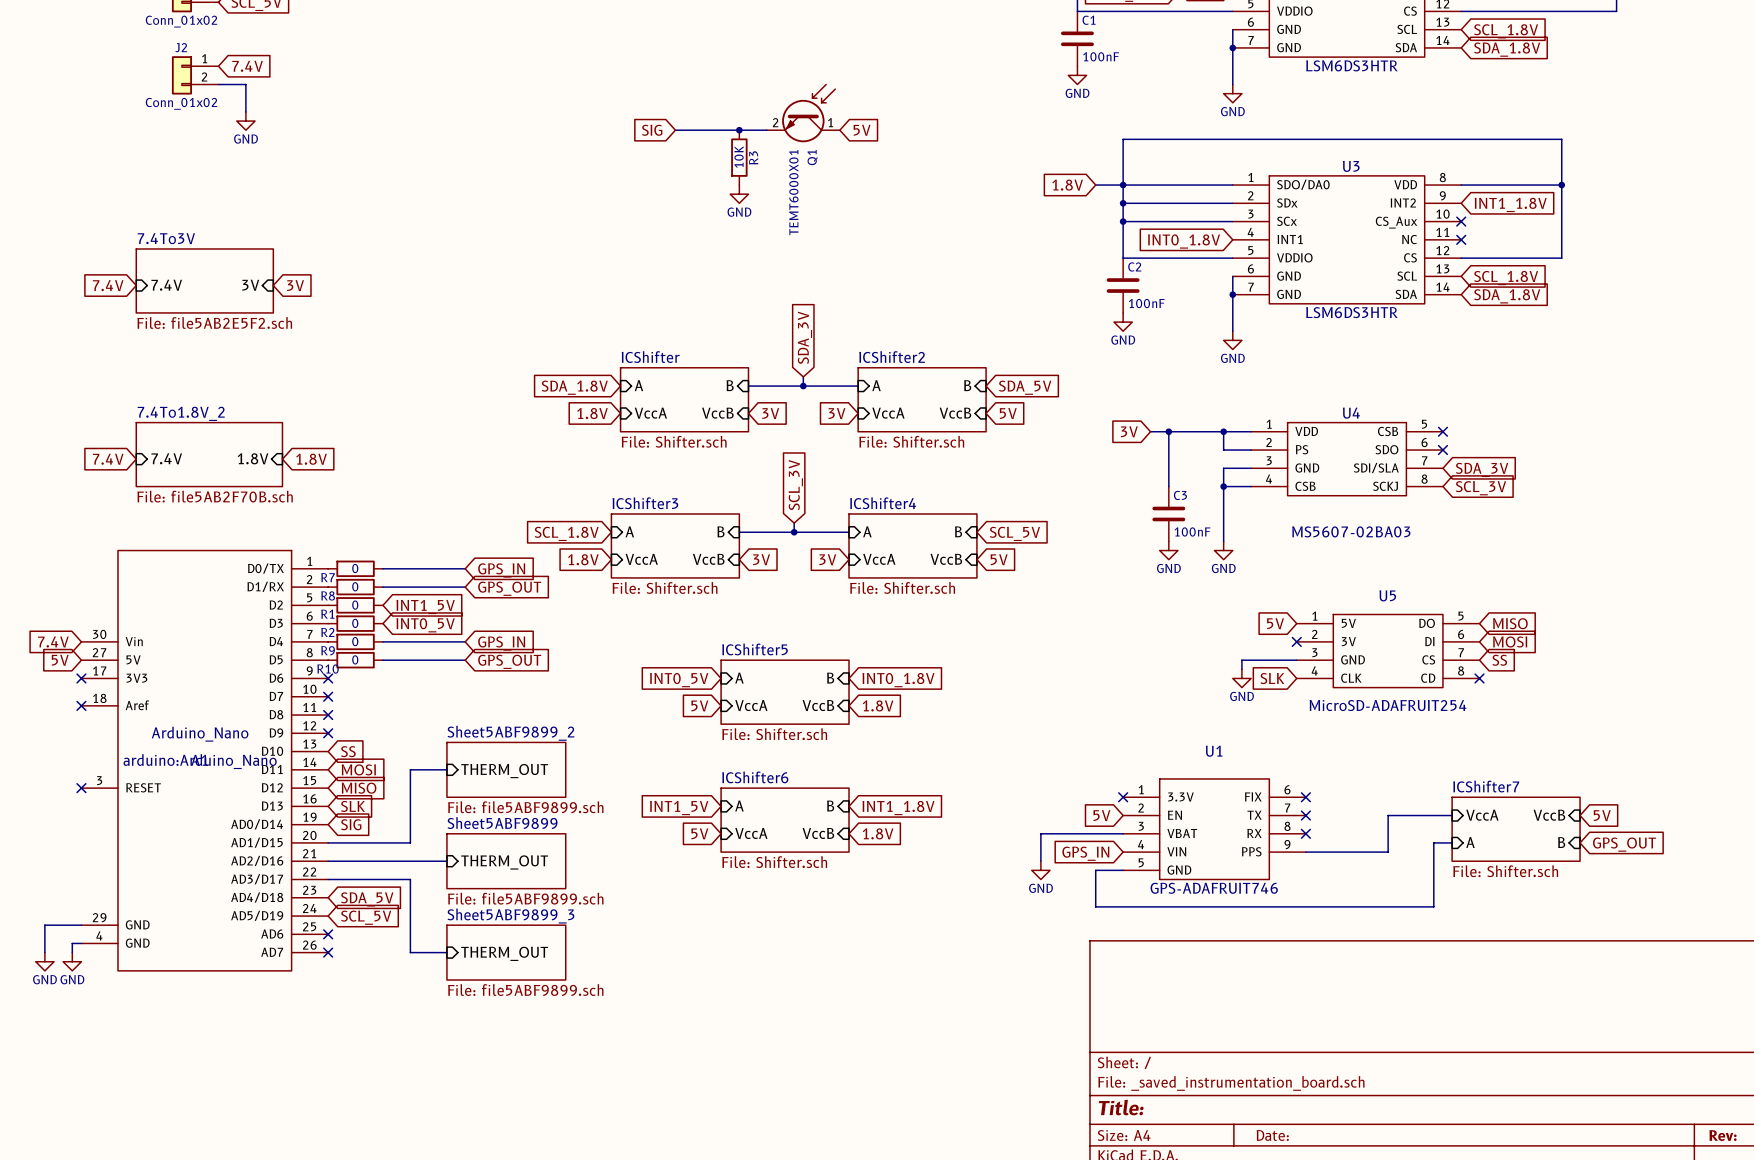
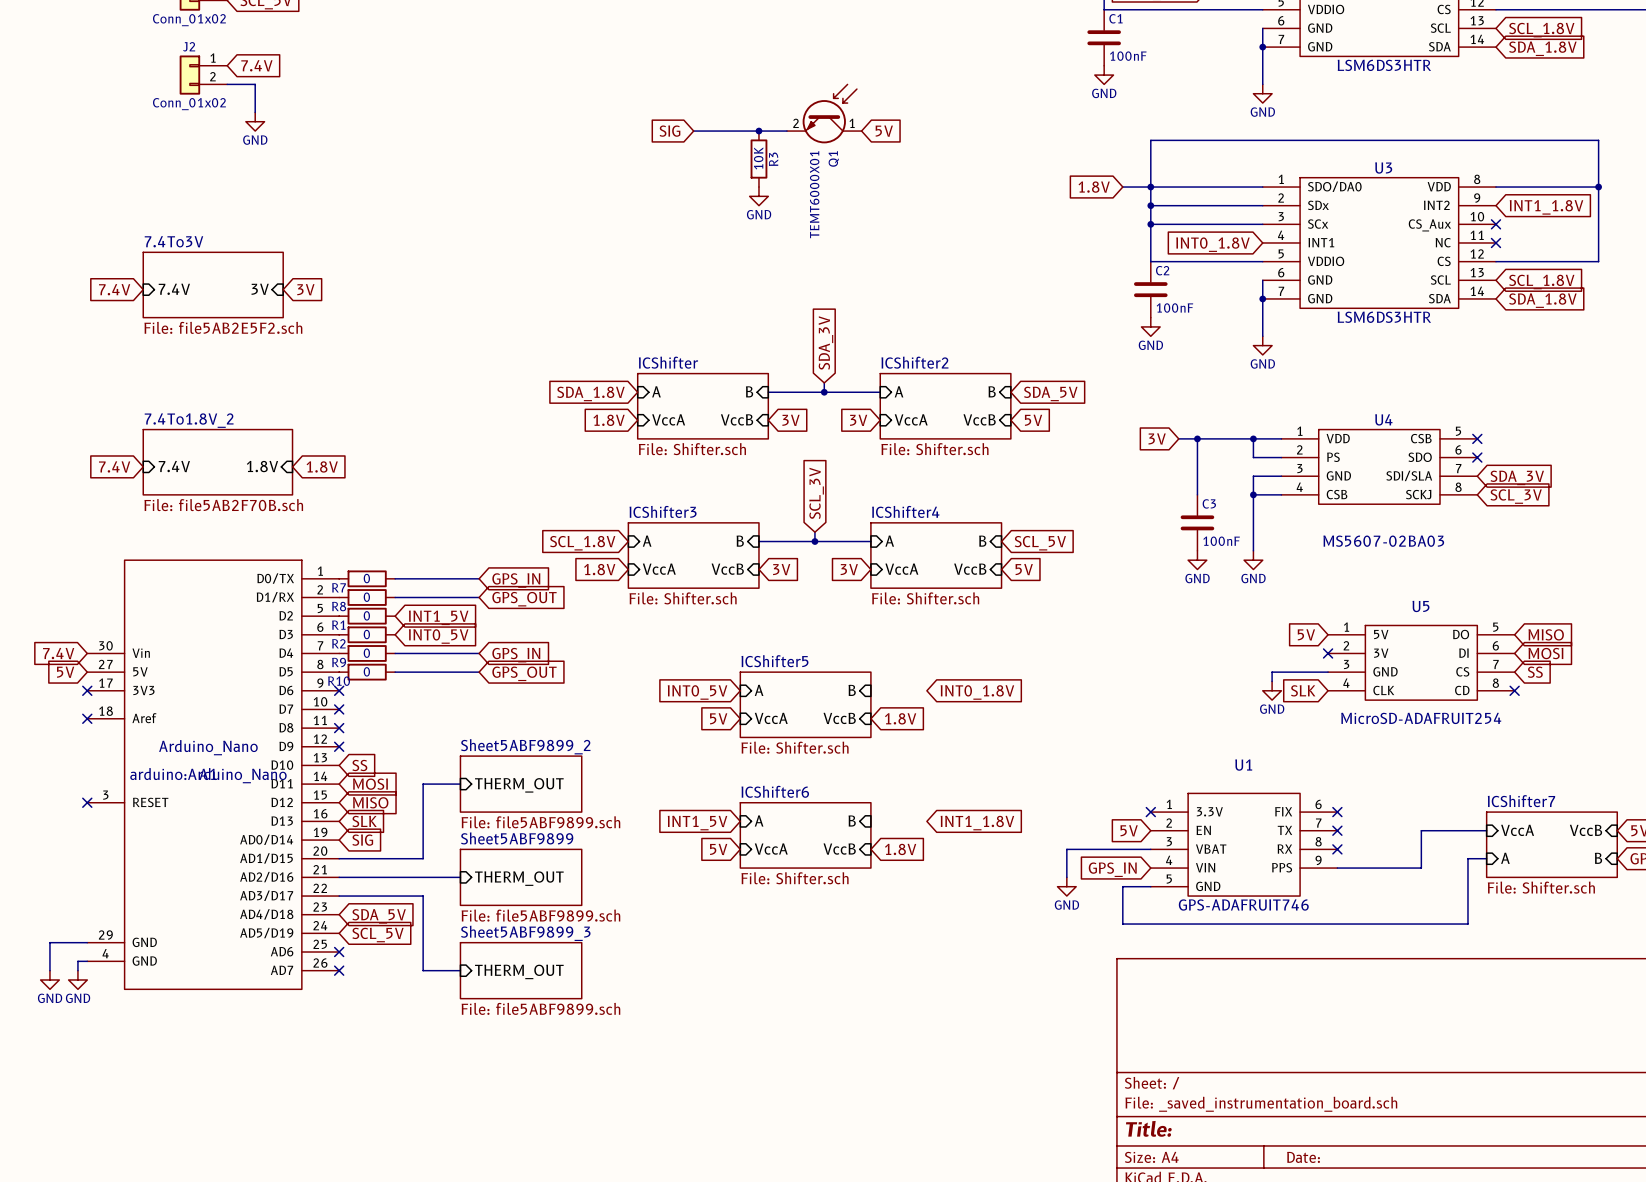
global label position: INT0_1.8V (898, 680) -> INT0_1.8V (977, 692)
global label position: INT1_1.8V (898, 808) -> INT1_1.8V (977, 823)

